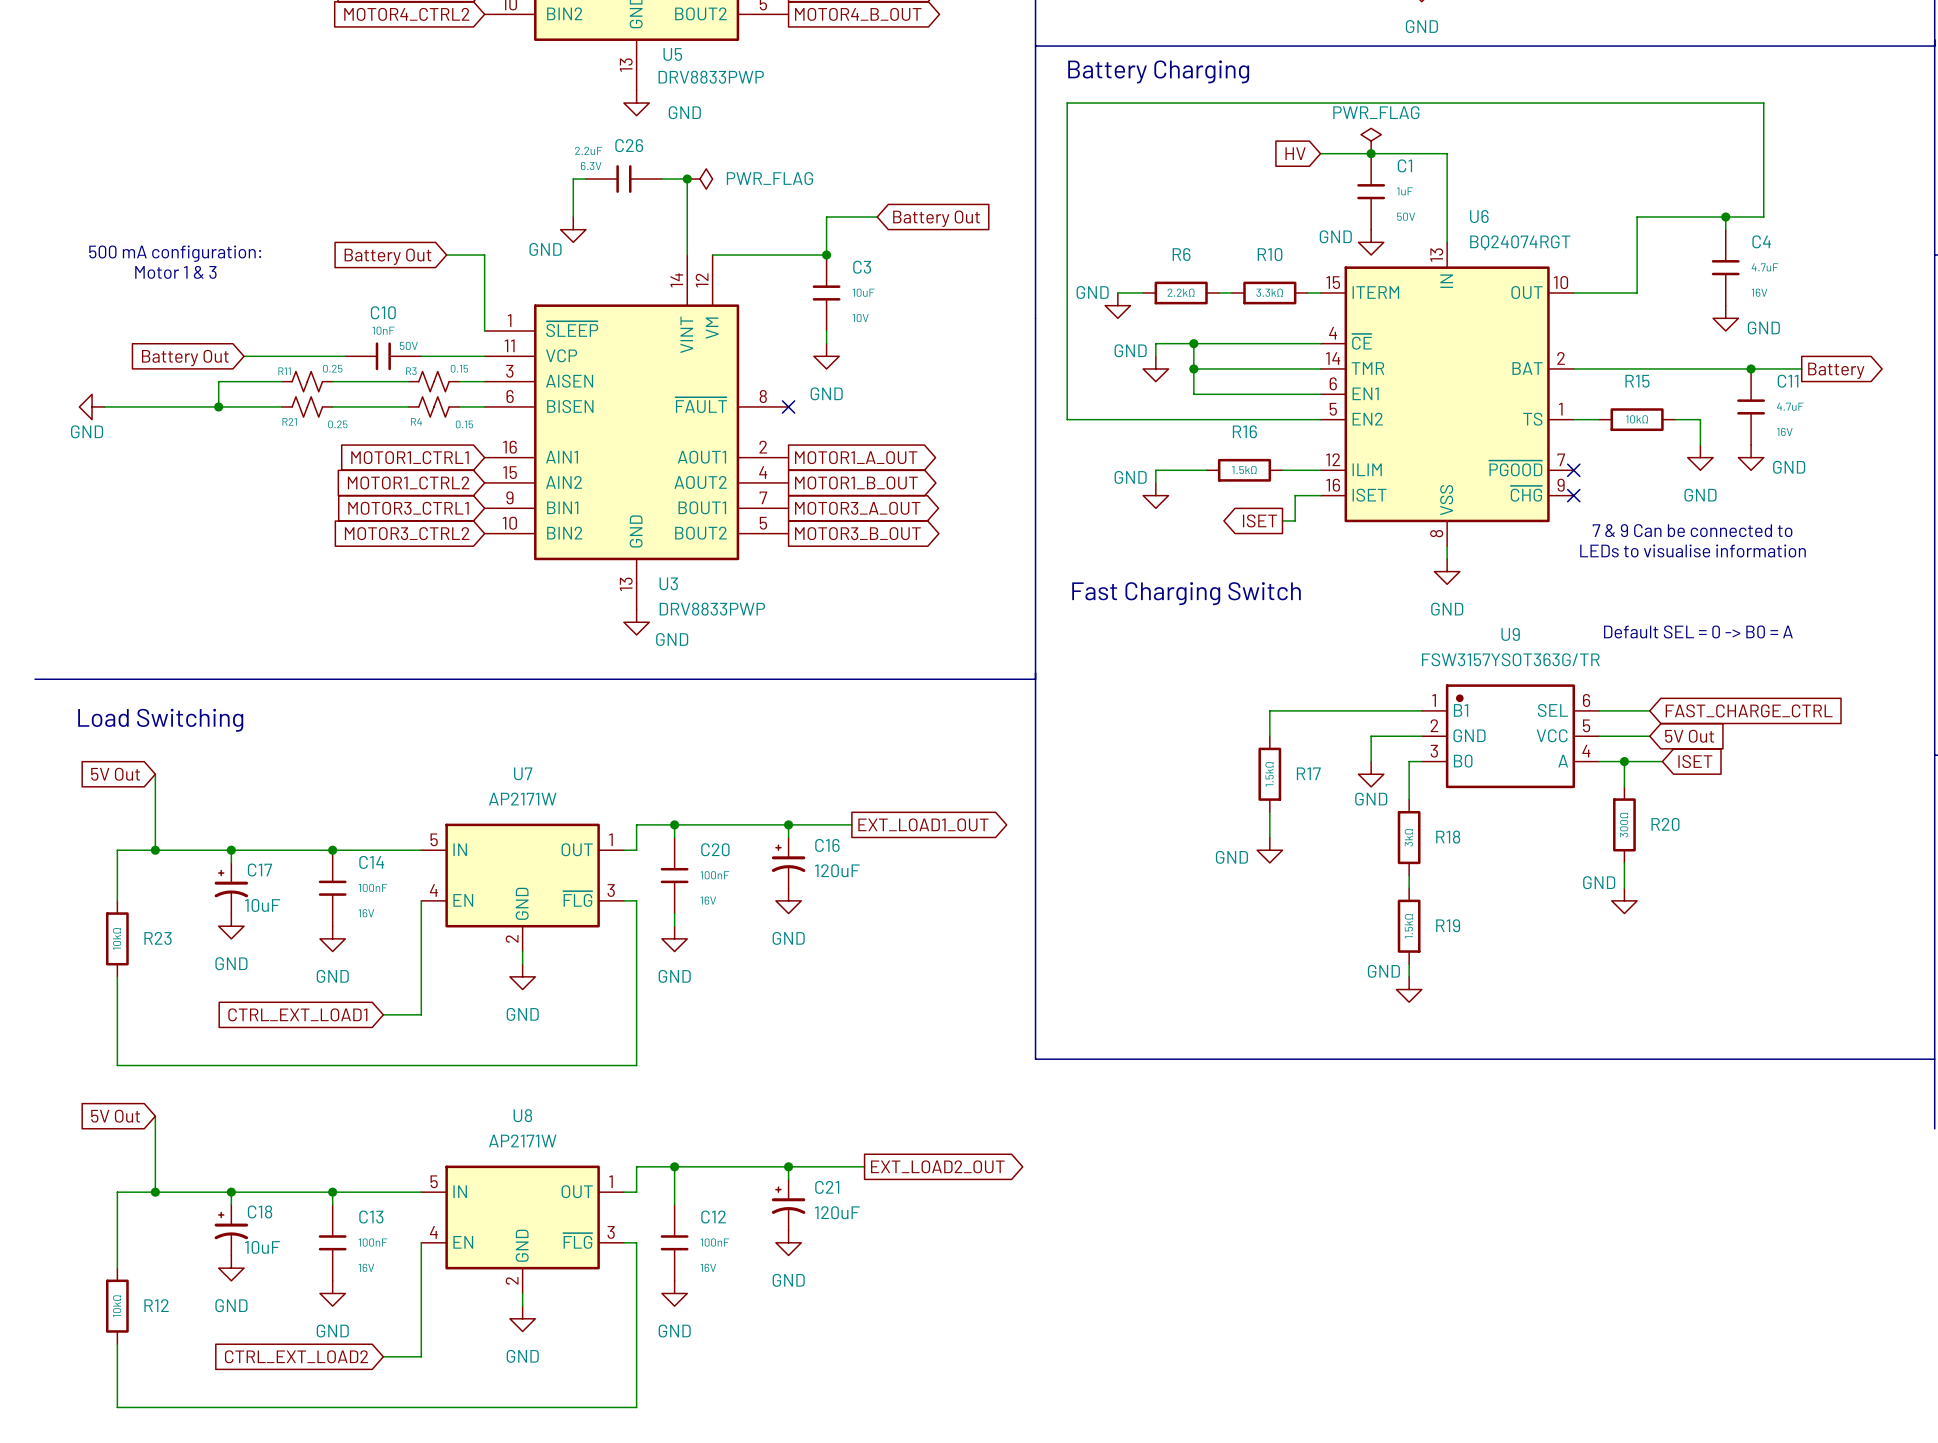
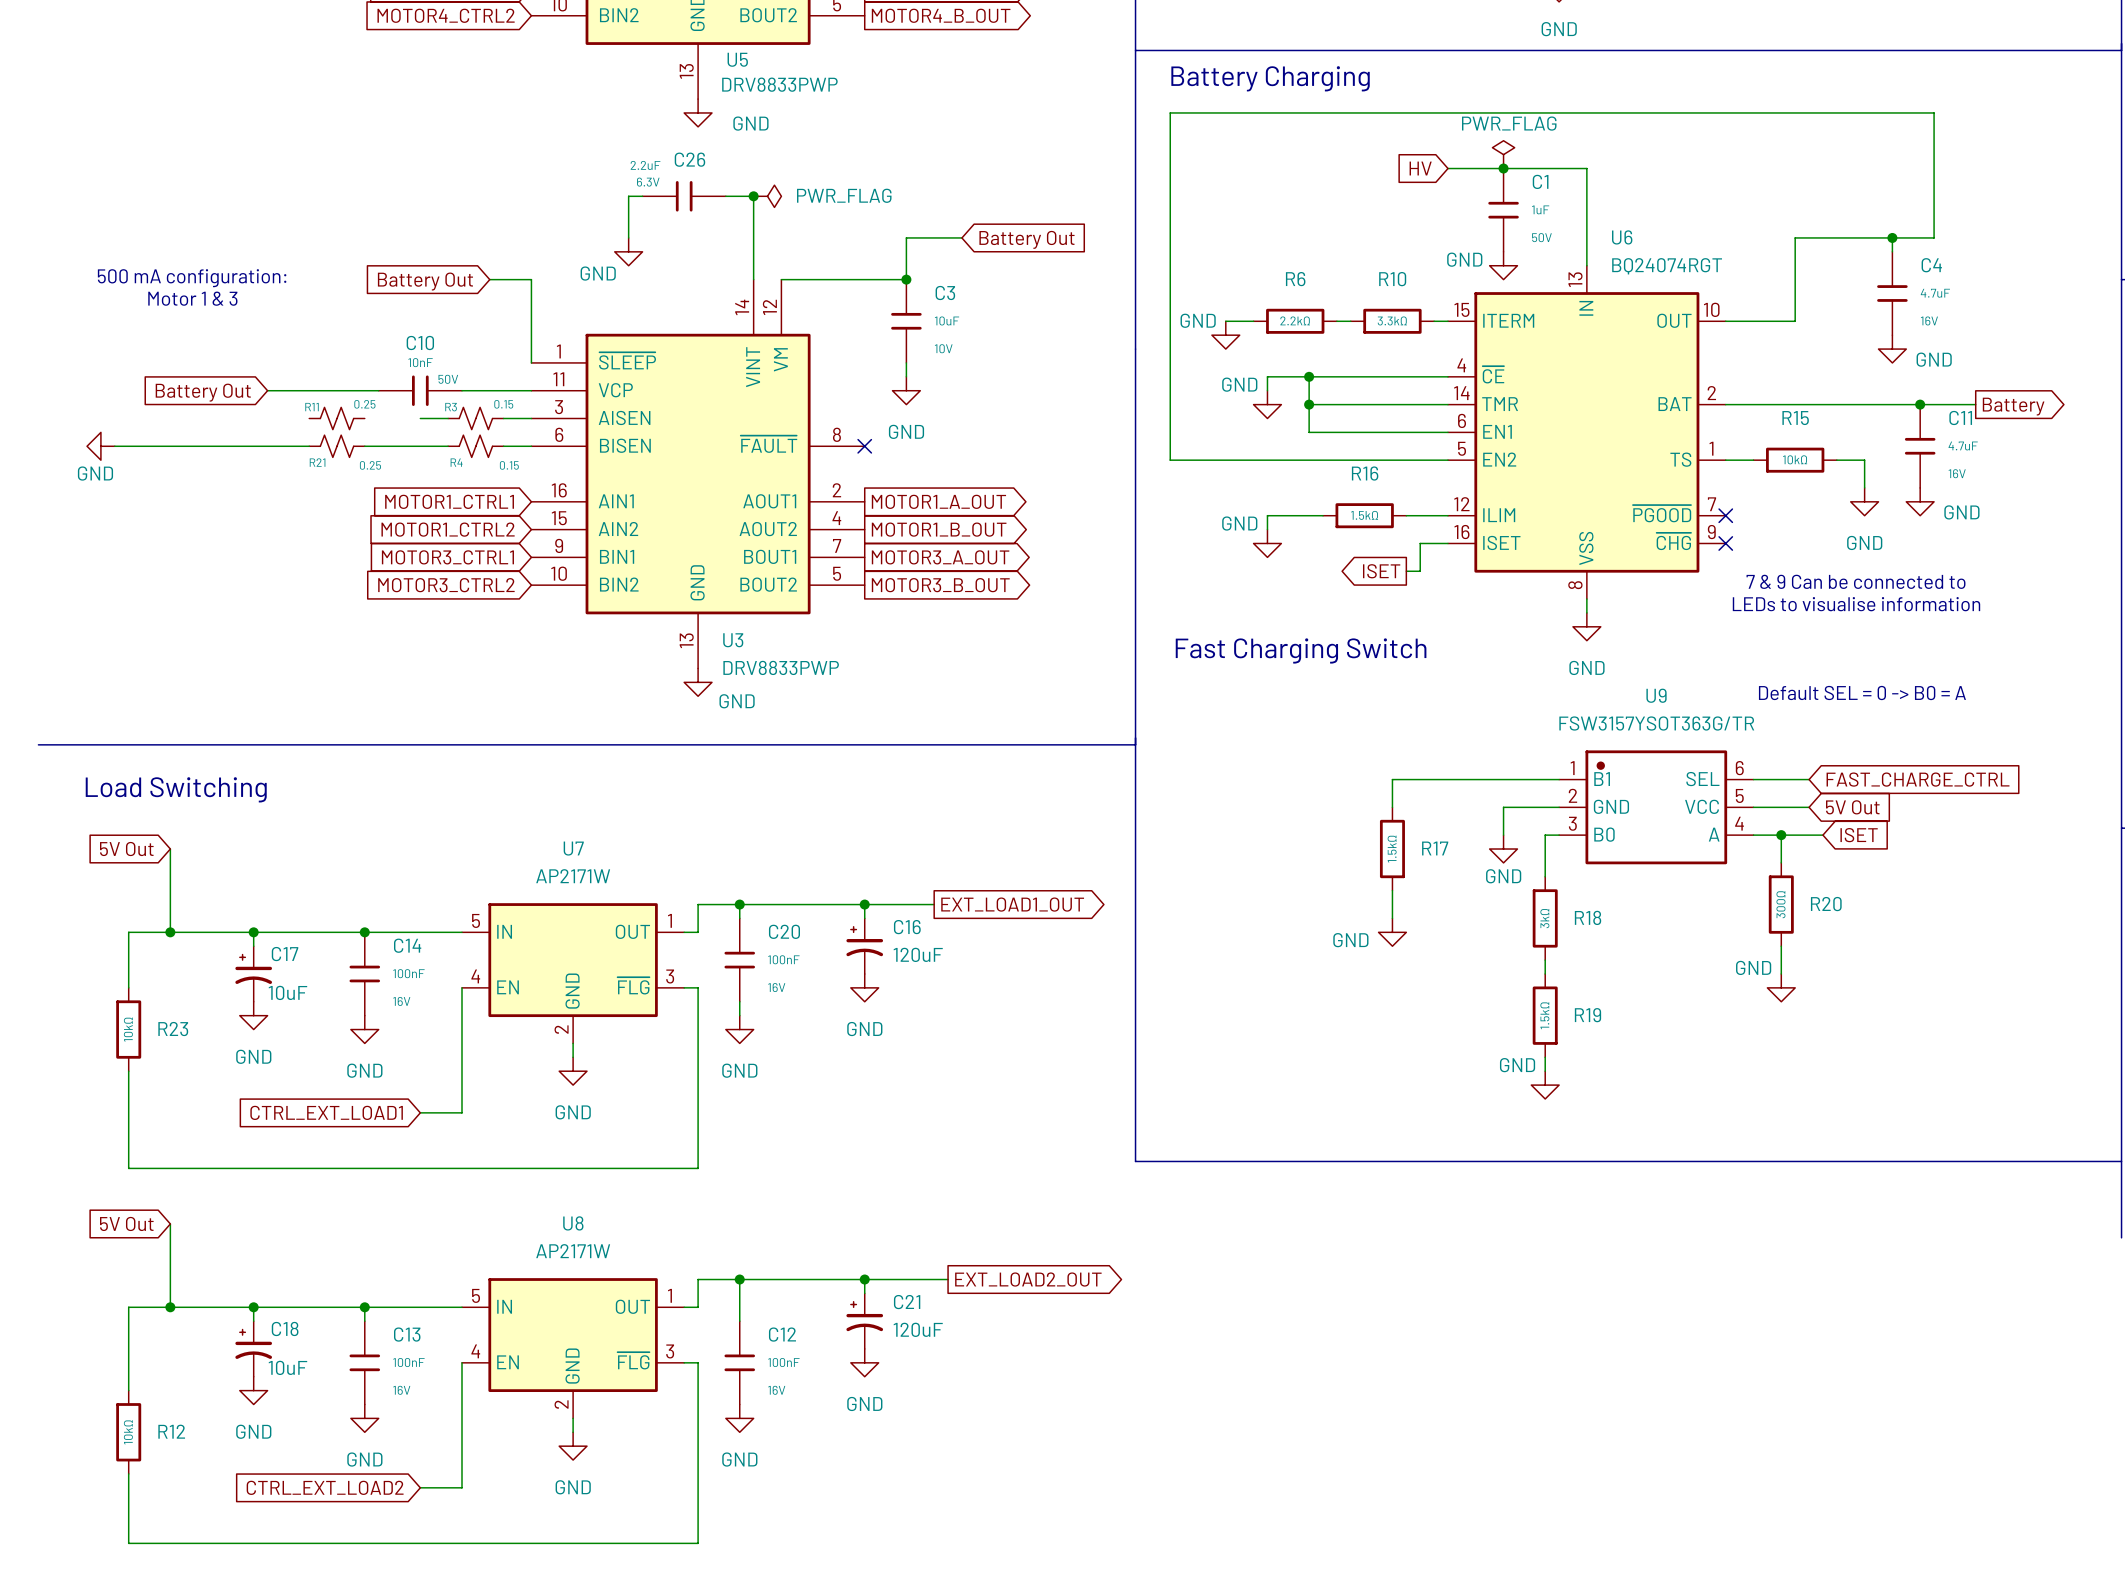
wire: (282, 381) (218, 381) (218, 406) -> none
wire: (332, 381) (383, 381) -> none
junction: (218, 406) -> none

